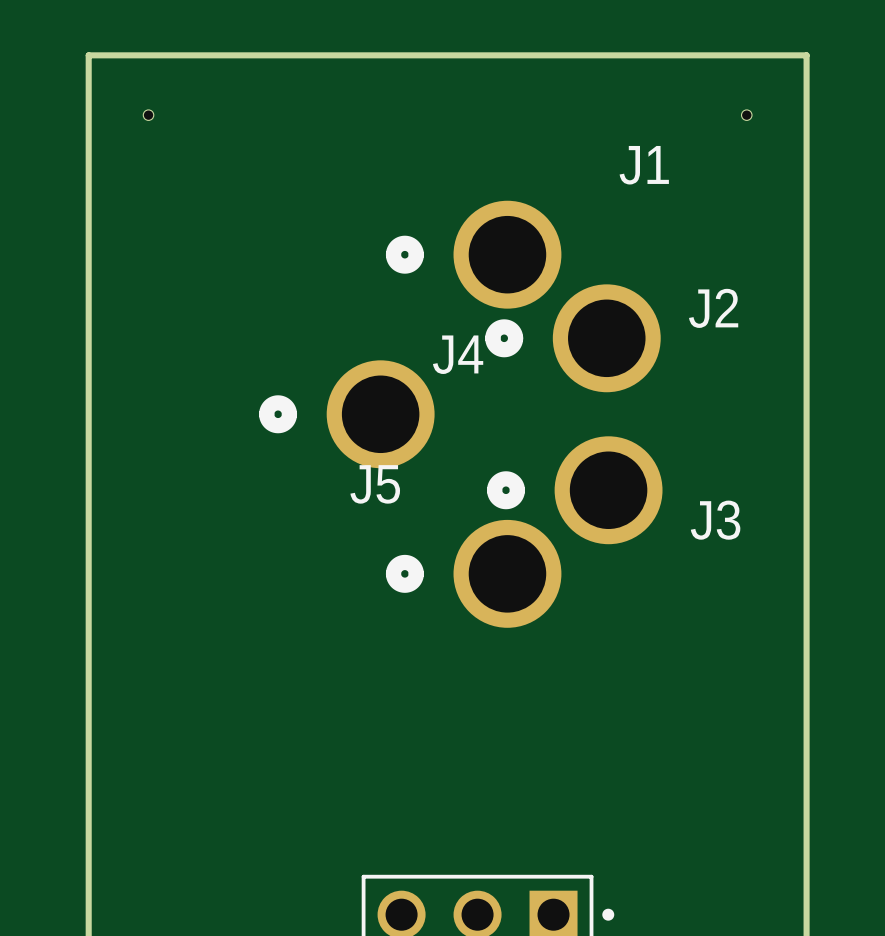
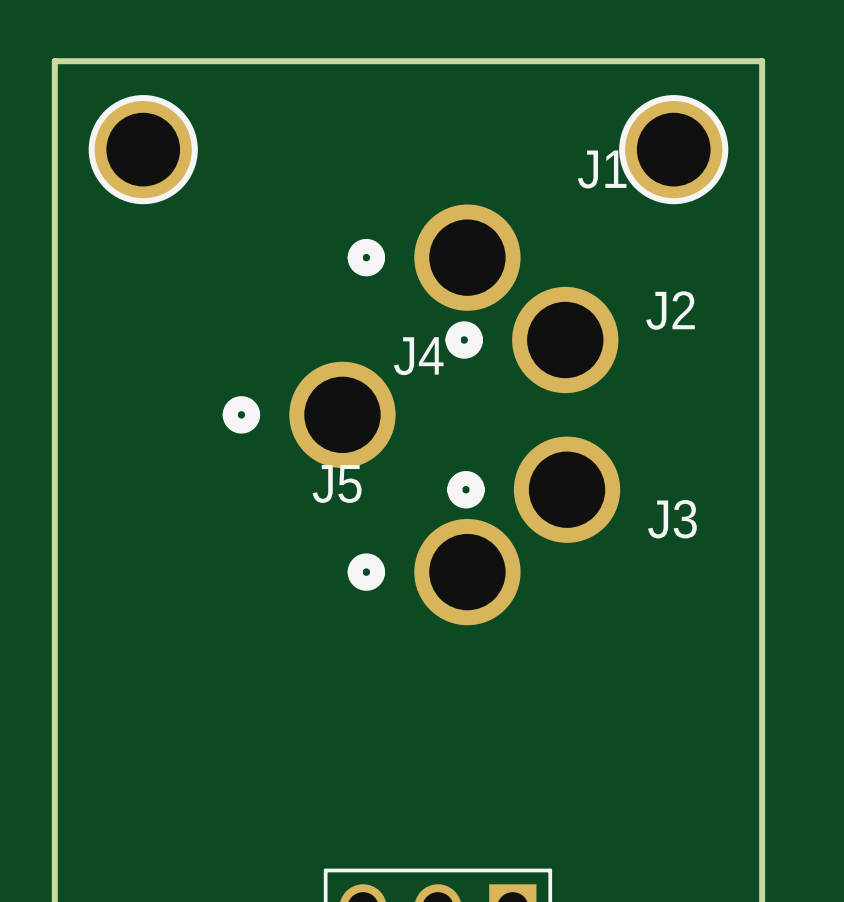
hole: (148, 115) -> none
hole: (746, 115) -> none
part: none -> (143, 149)
part: none -> (673, 149)

